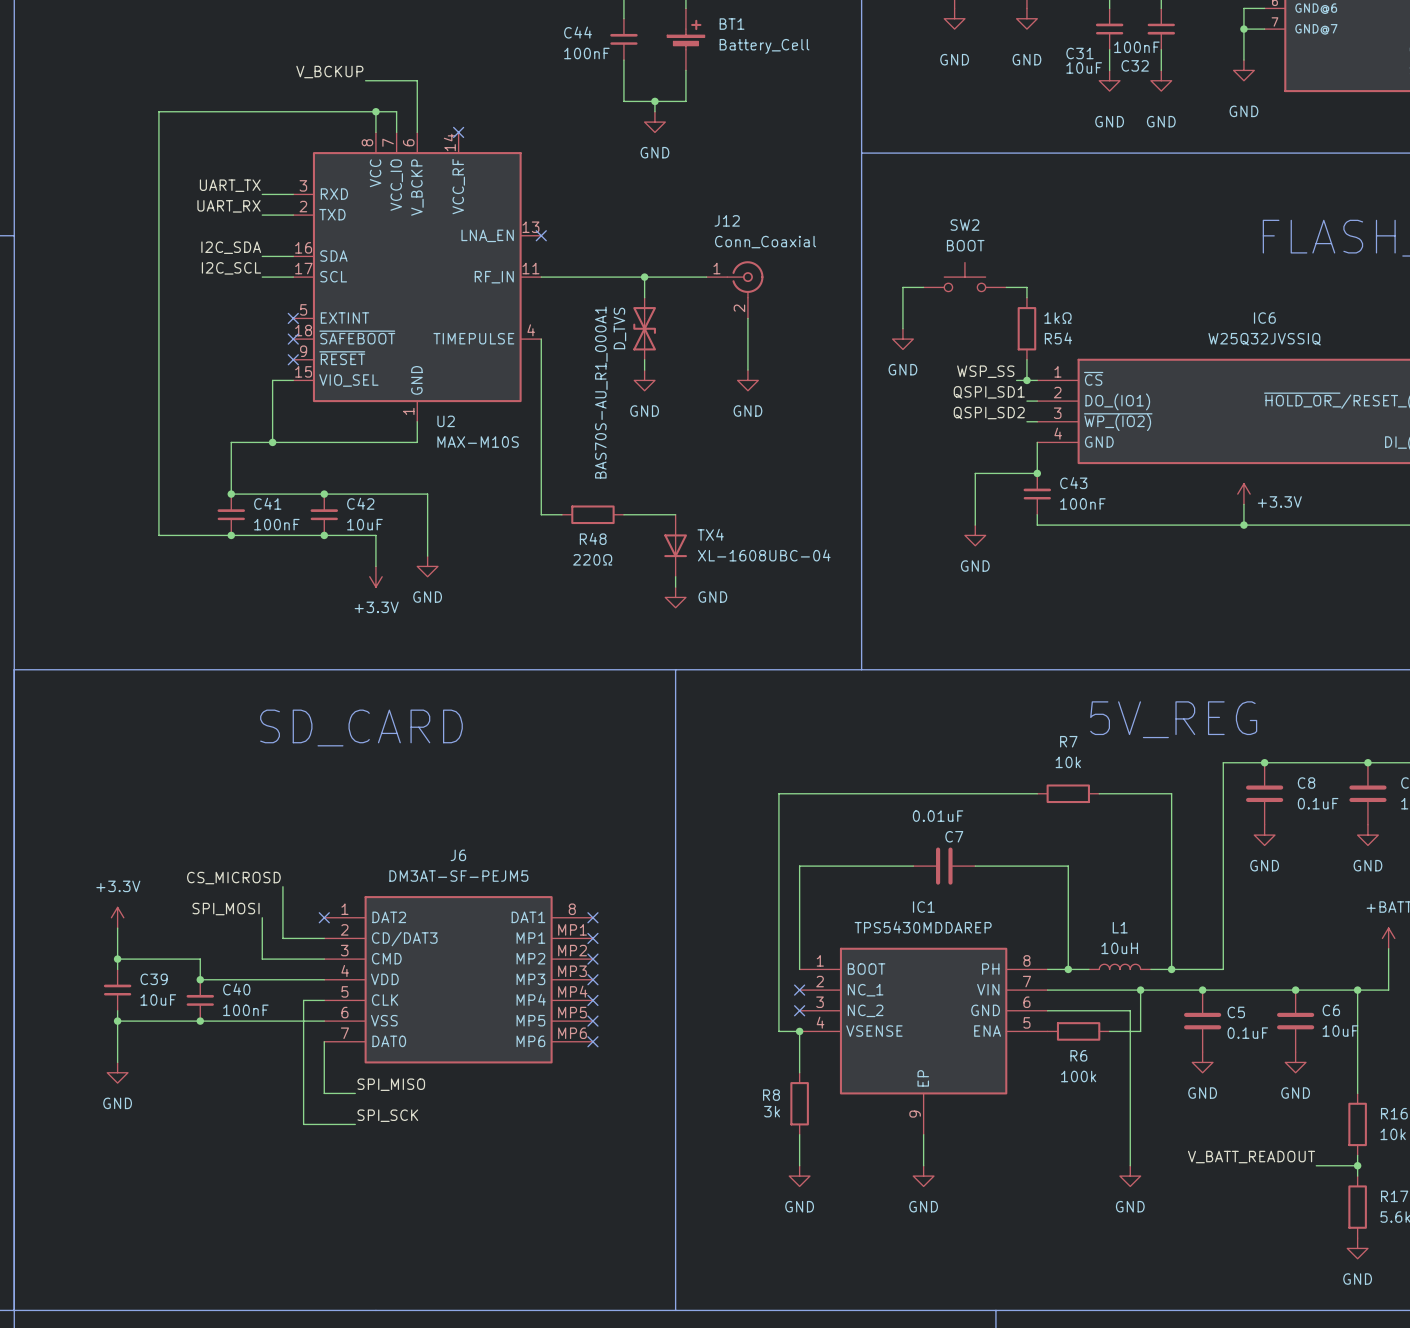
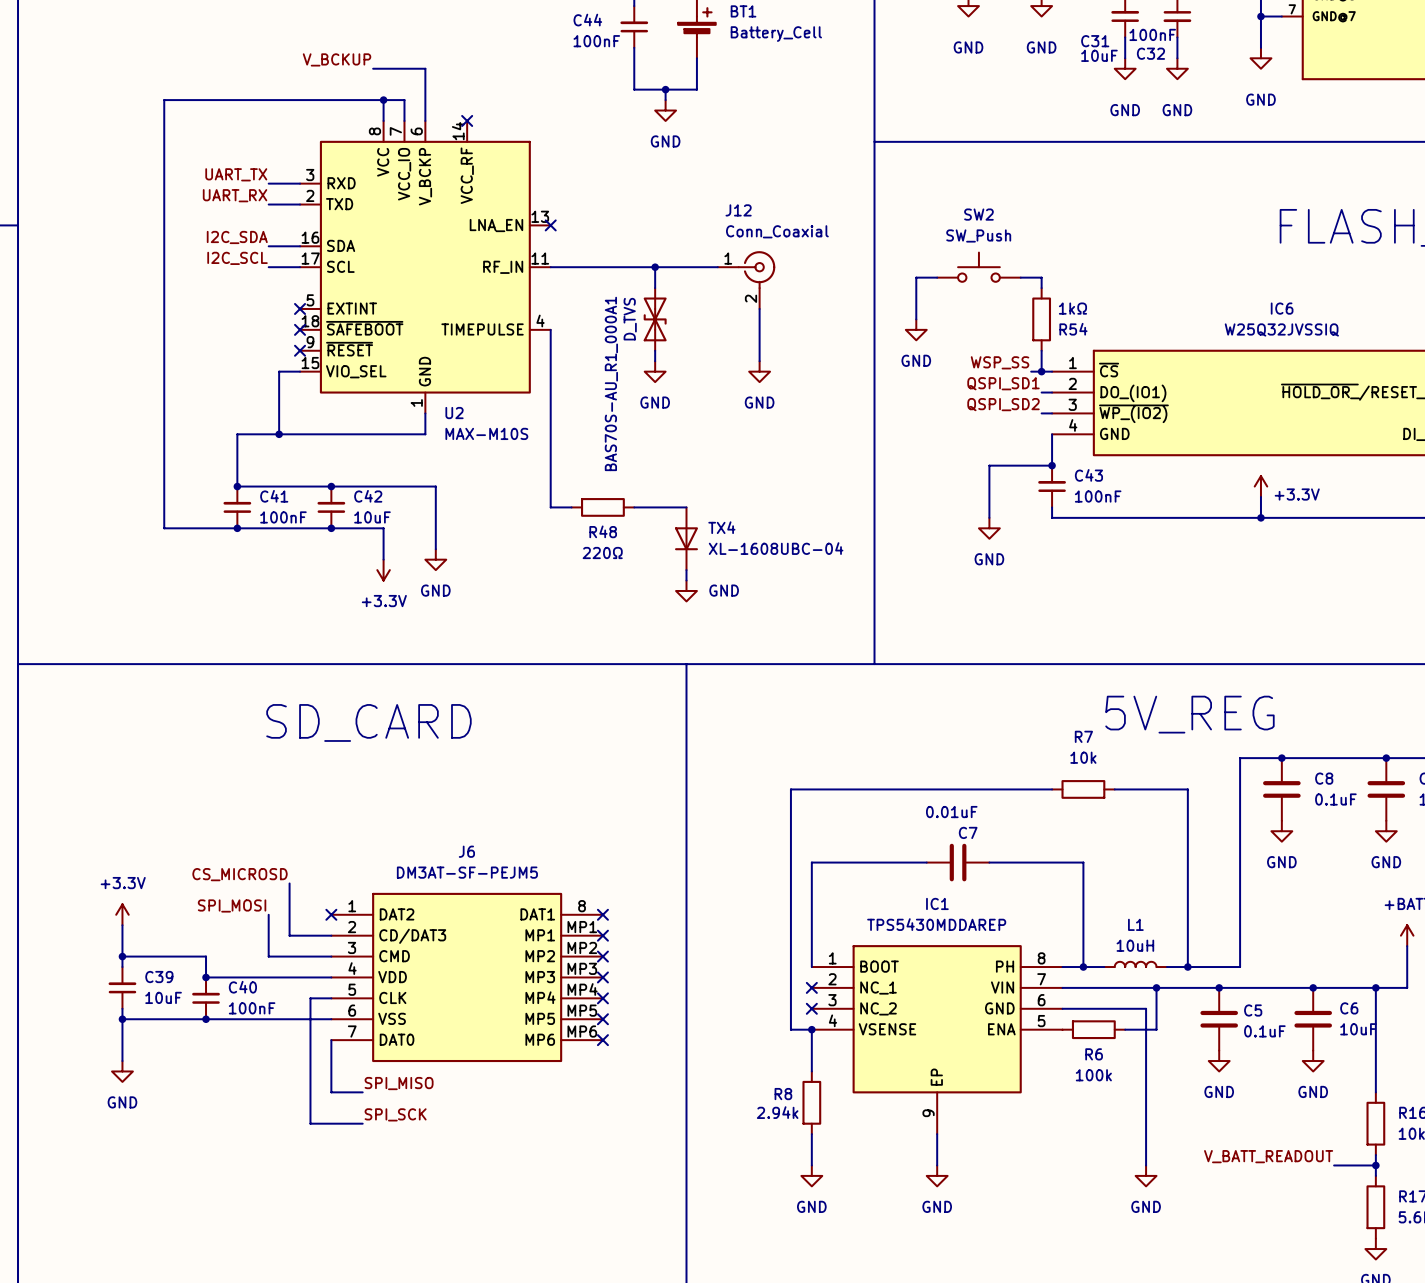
SW2 value: BOOT (965, 245) -> SW_Push (978, 235)
R8 value: 3k (772, 1111) -> 2.94k (777, 1112)

